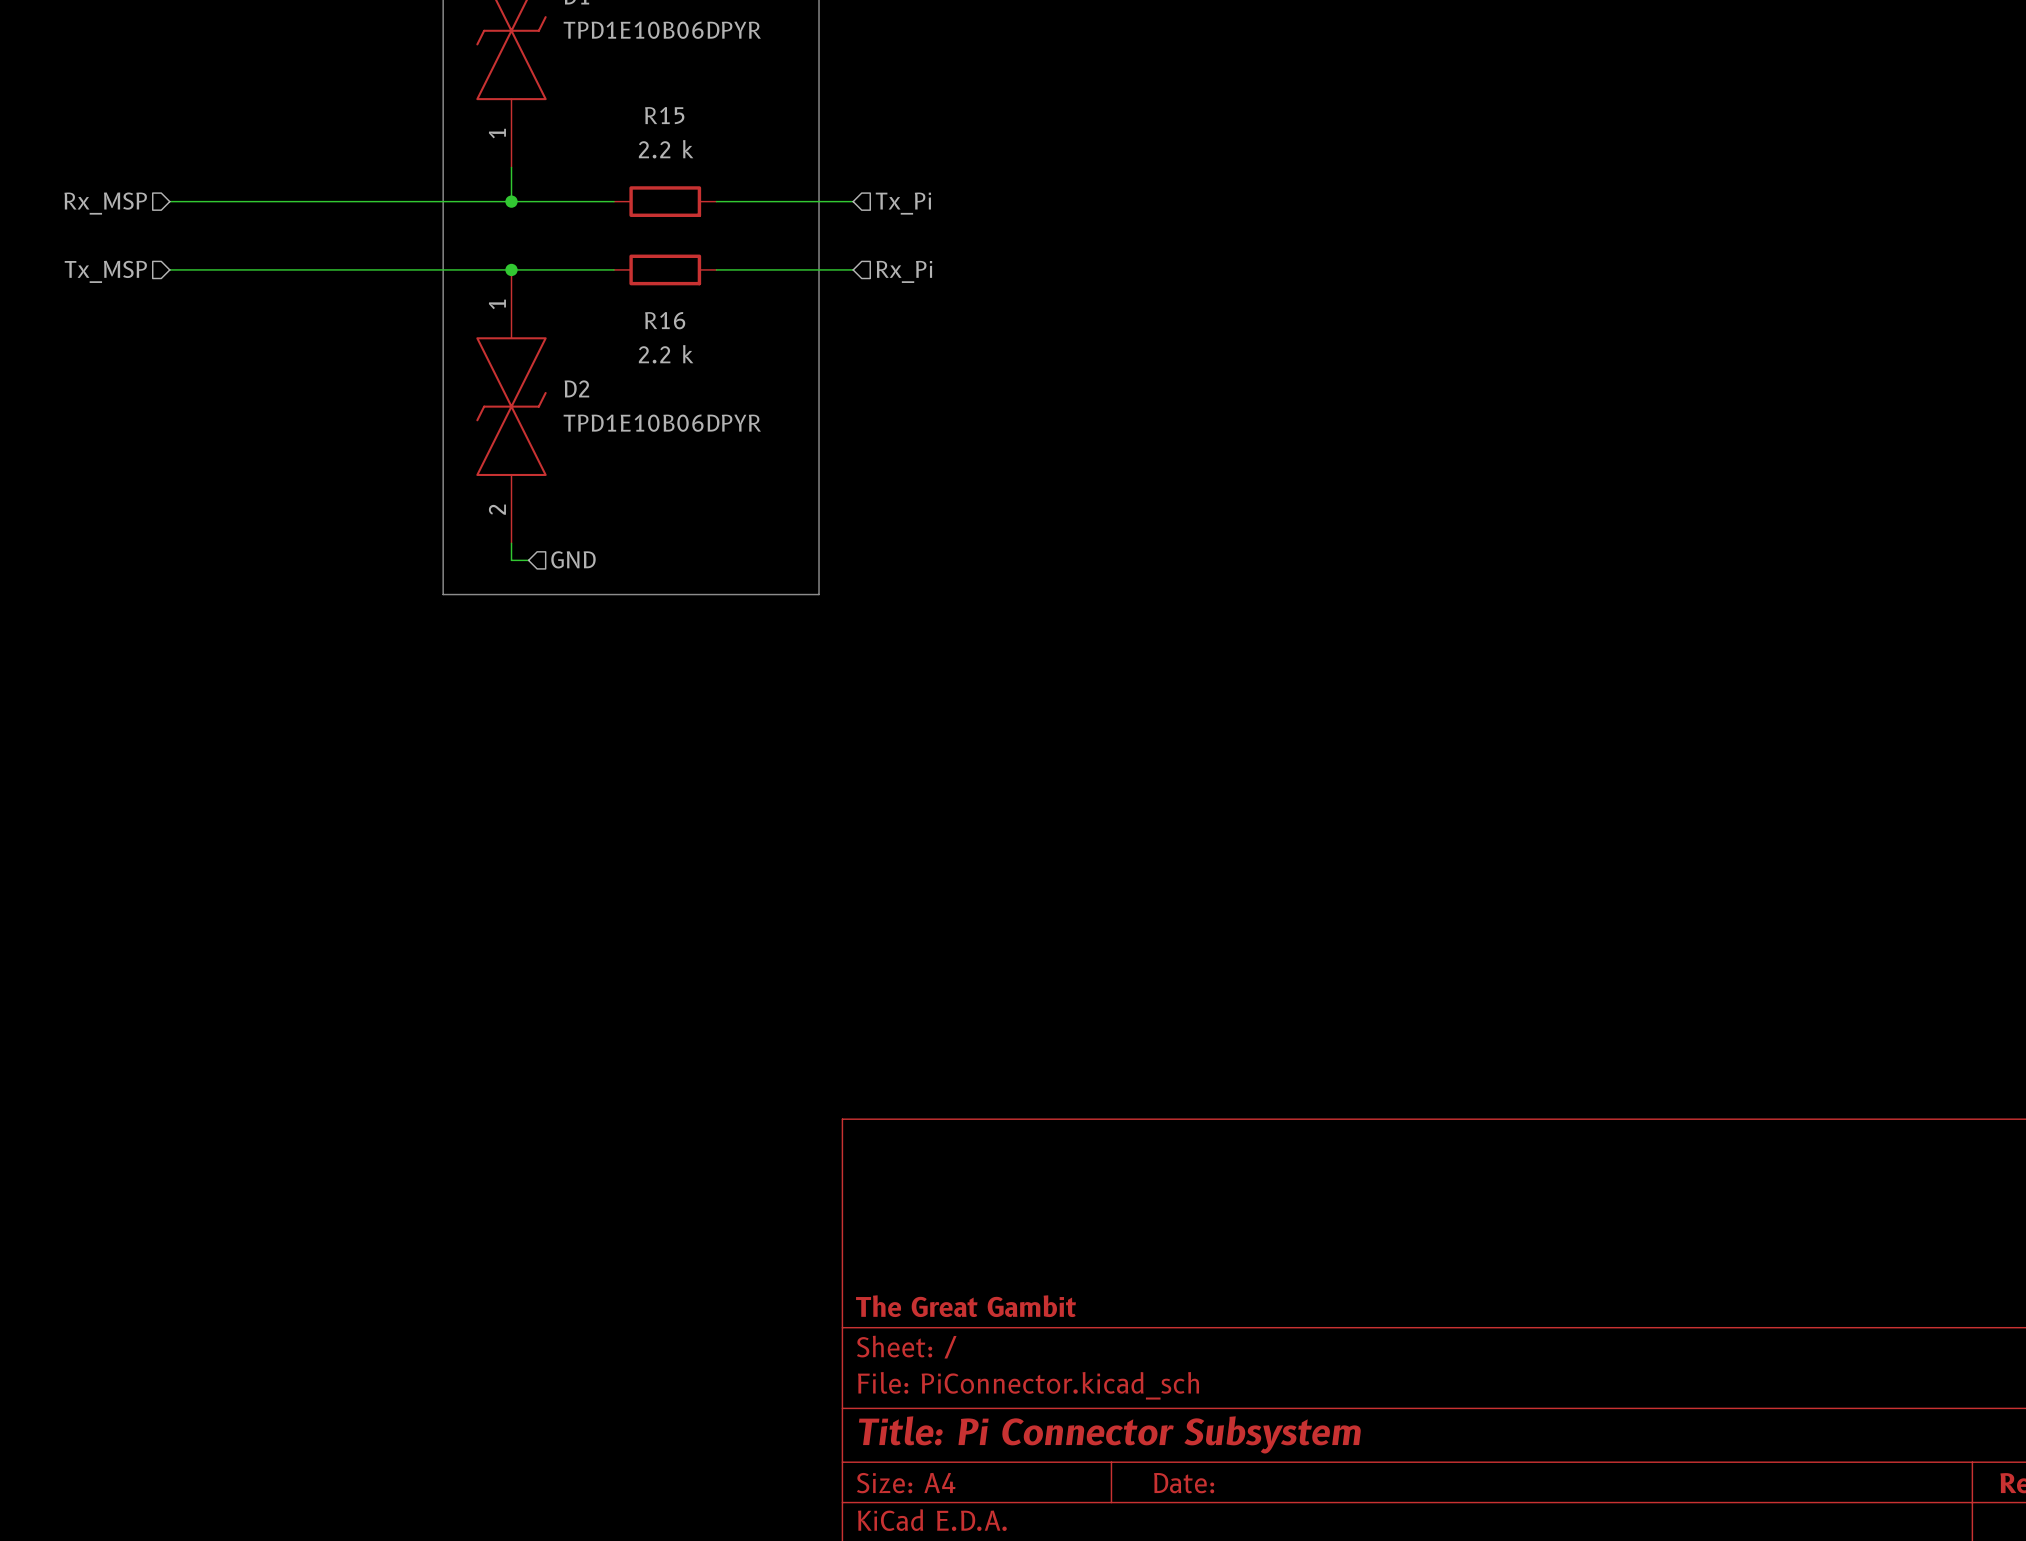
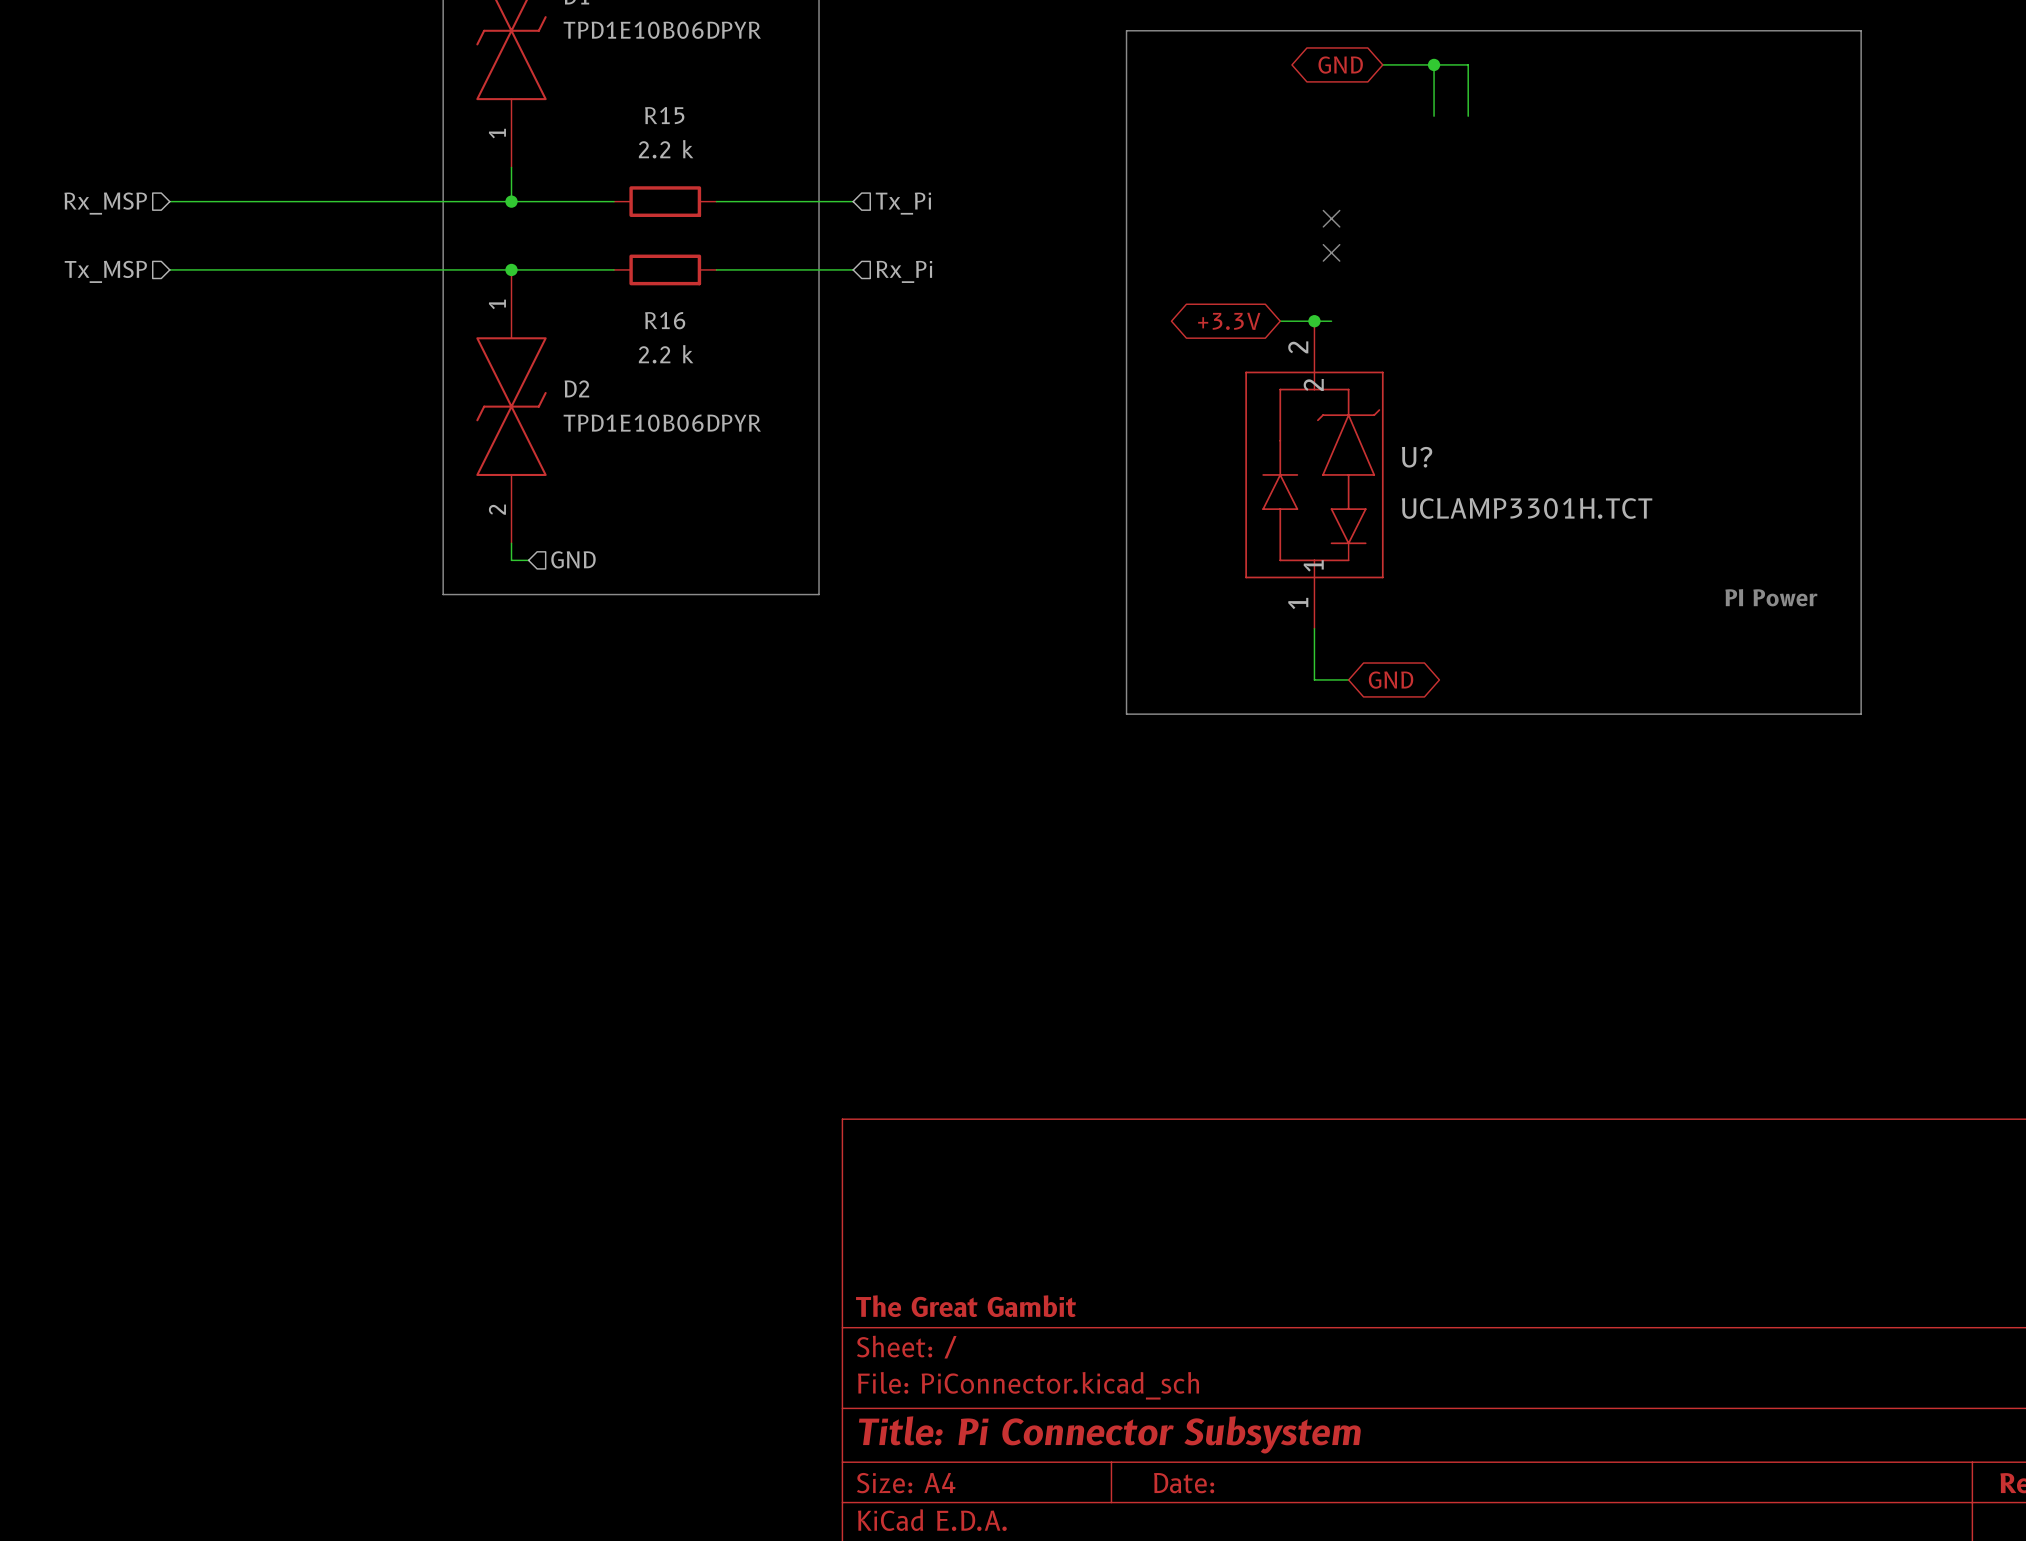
line: none -> (1126, 30) (1126, 714) (1861, 714) (1861, 30) (1126, 30)
wire: none -> (1382, 64) (1468, 64) (1468, 116)
wire: none -> (1434, 64) (1434, 116)
junction: none -> (1434, 64)
global label: none -> GND (1340, 65)
no-connect mark: none -> (1331, 218)
no-connect mark: none -> (1331, 252)
global label: none -> +3.3V (1229, 321)
wire: none -> (1280, 321) (1331, 321)
junction: none -> (1314, 321)
U?: none -> UCLAMP3301H.TCT (1314, 474)
text: none -> PI Power (1771, 597)
wire: none -> (1314, 628) (1314, 679) (1348, 679)
global label: none -> GND (1391, 680)

